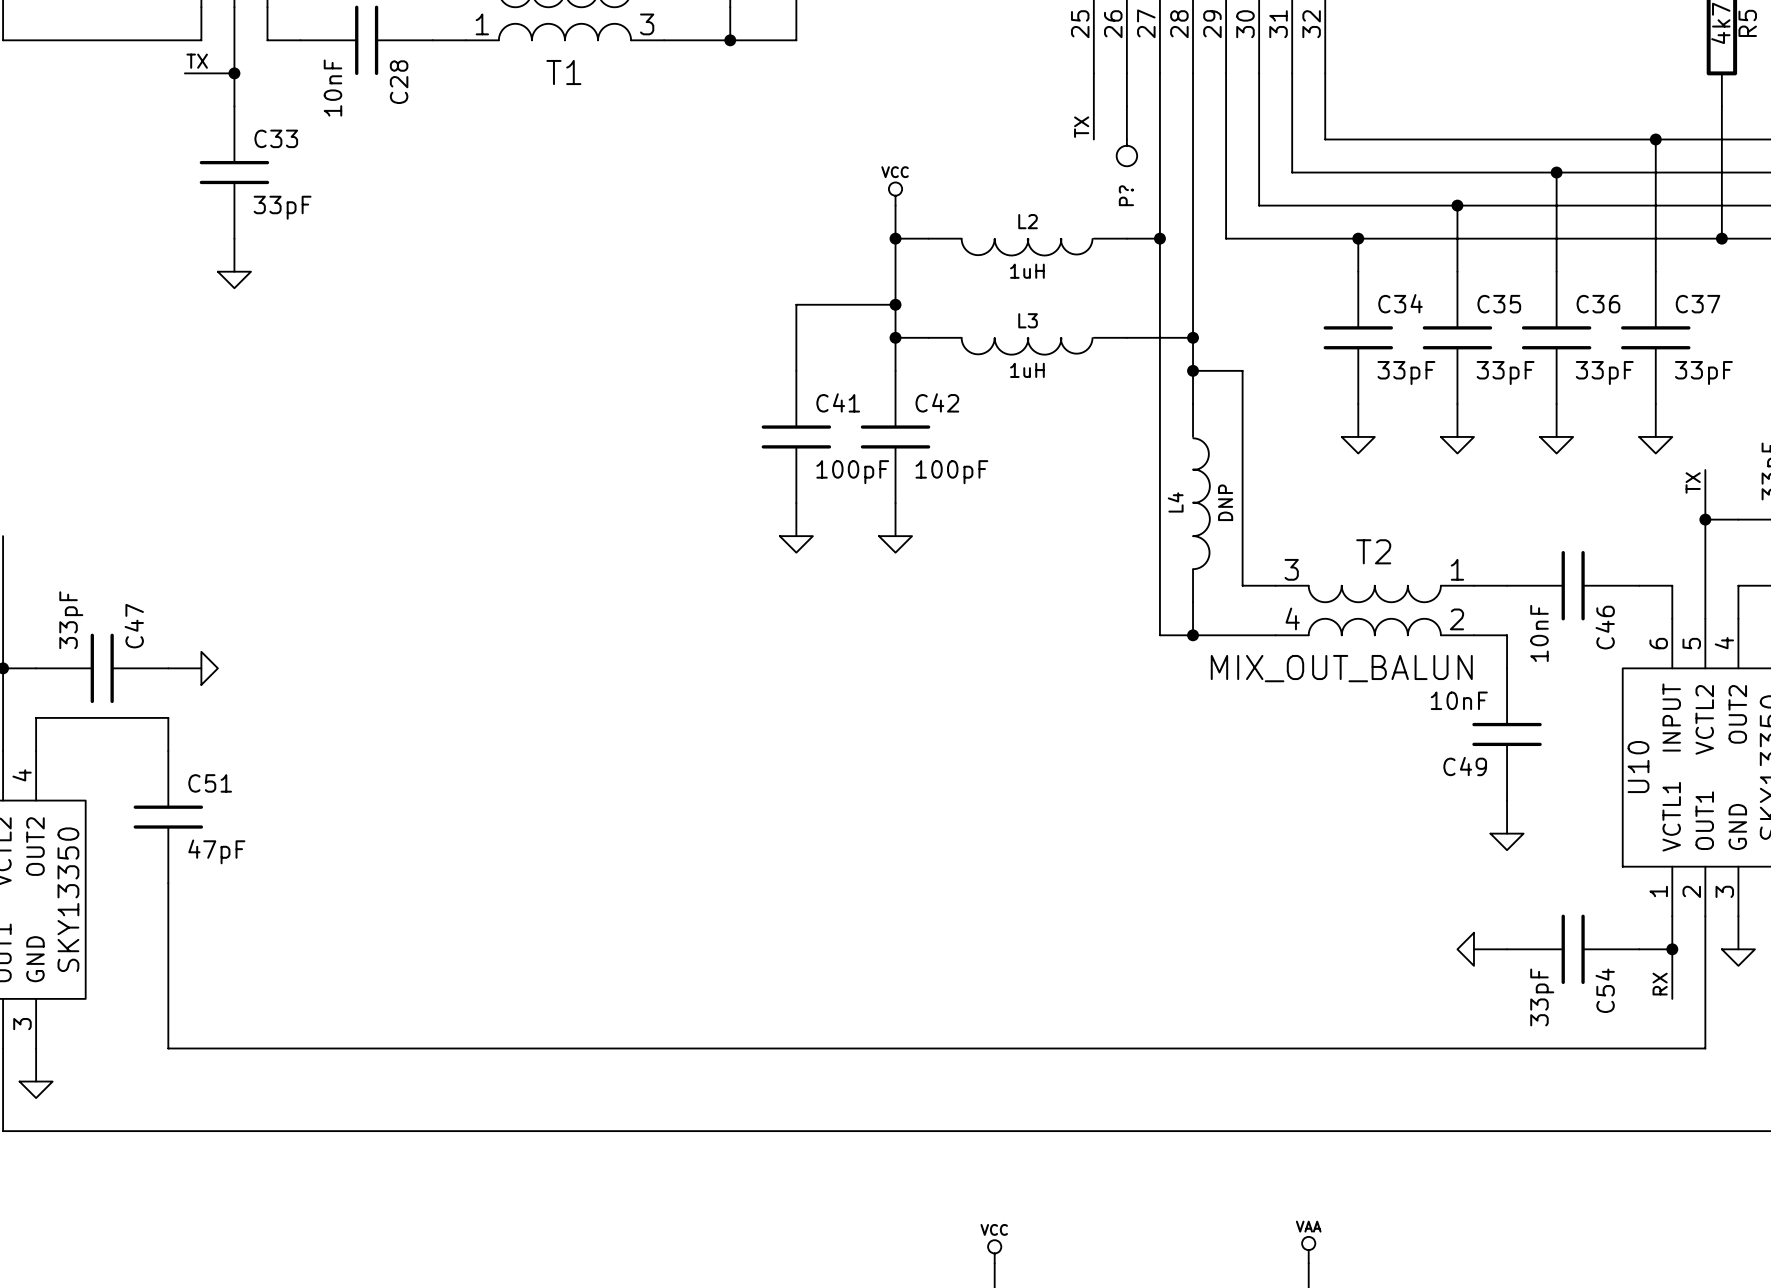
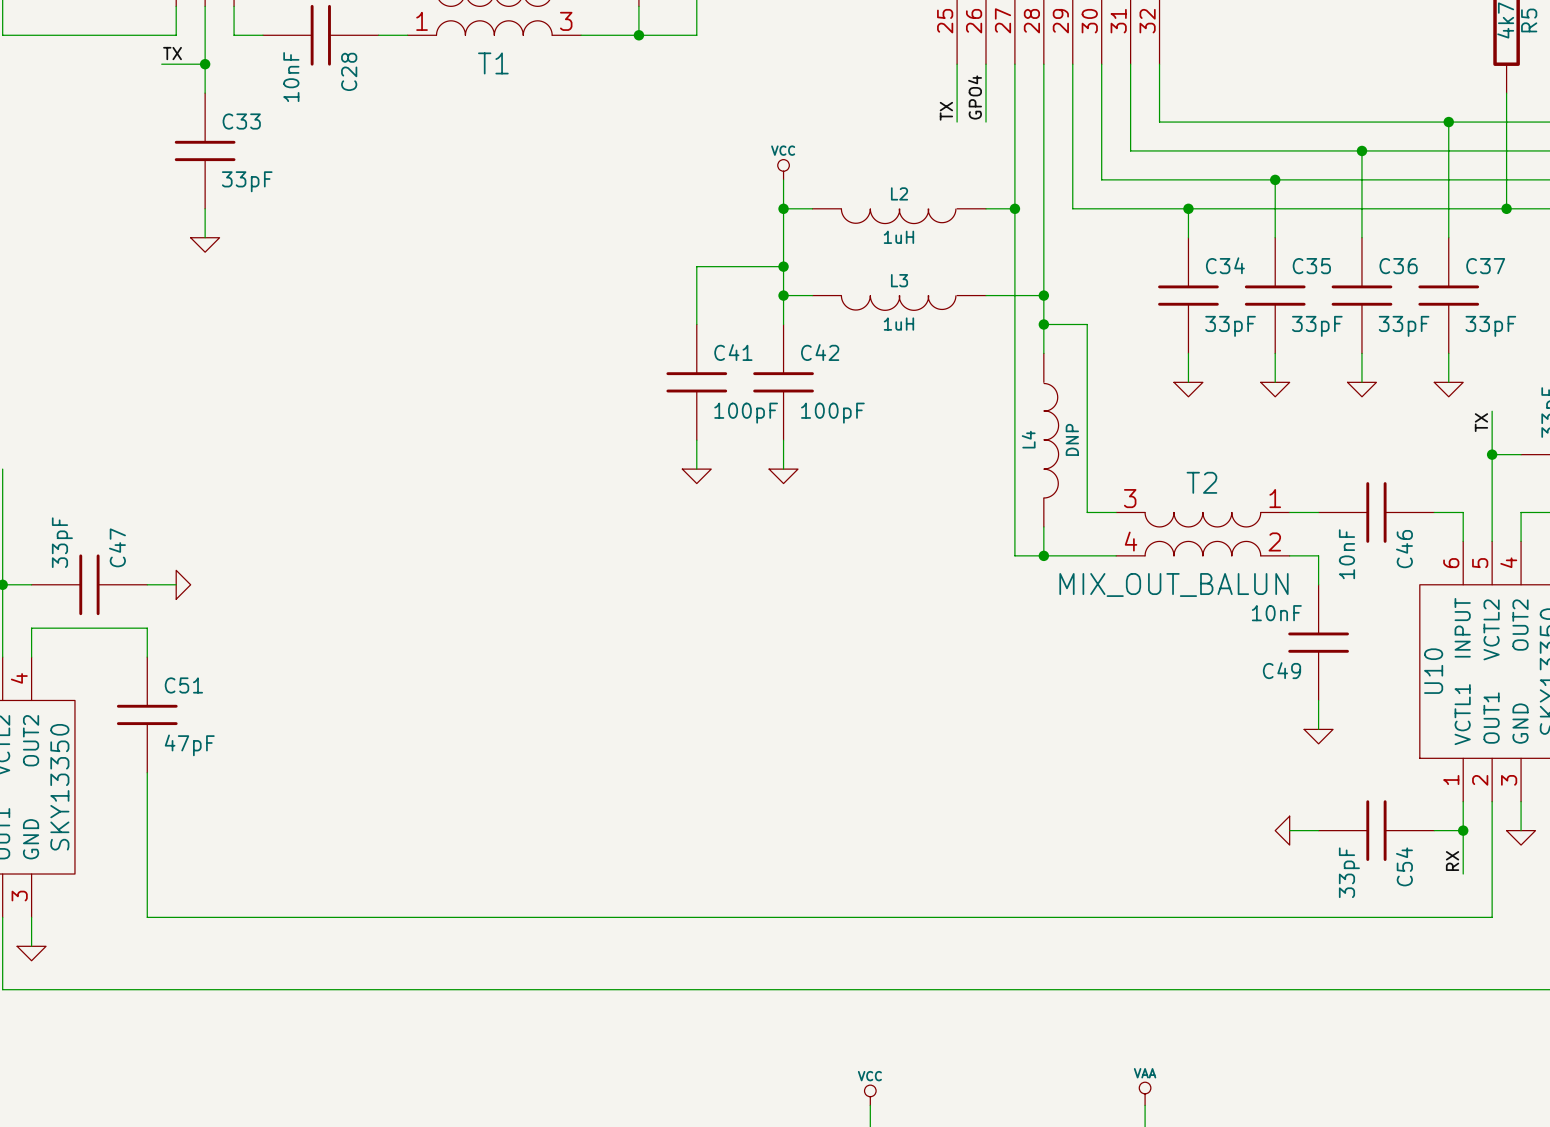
label: none -> GPO4 (975, 97)
P?: (1126, 136) -> none

